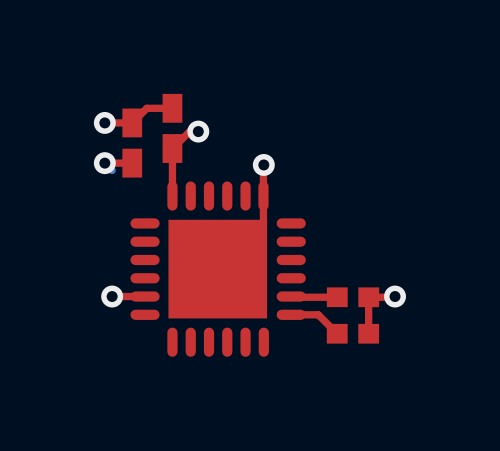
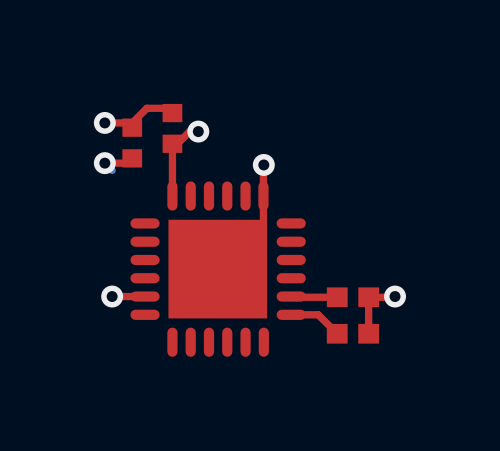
part footprint: [162, 93, 183, 163] -> [162, 103, 183, 153]
part footprint: [122, 108, 143, 178] -> [122, 118, 143, 168]

